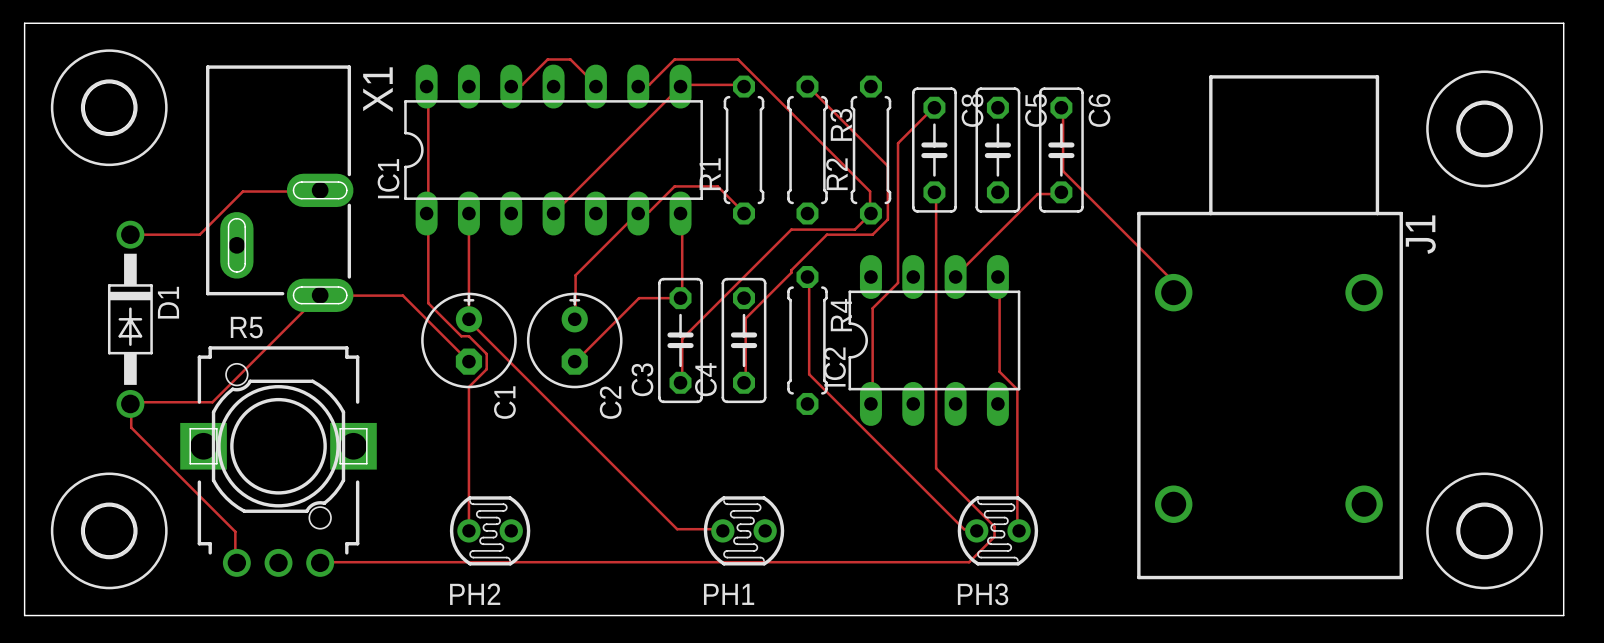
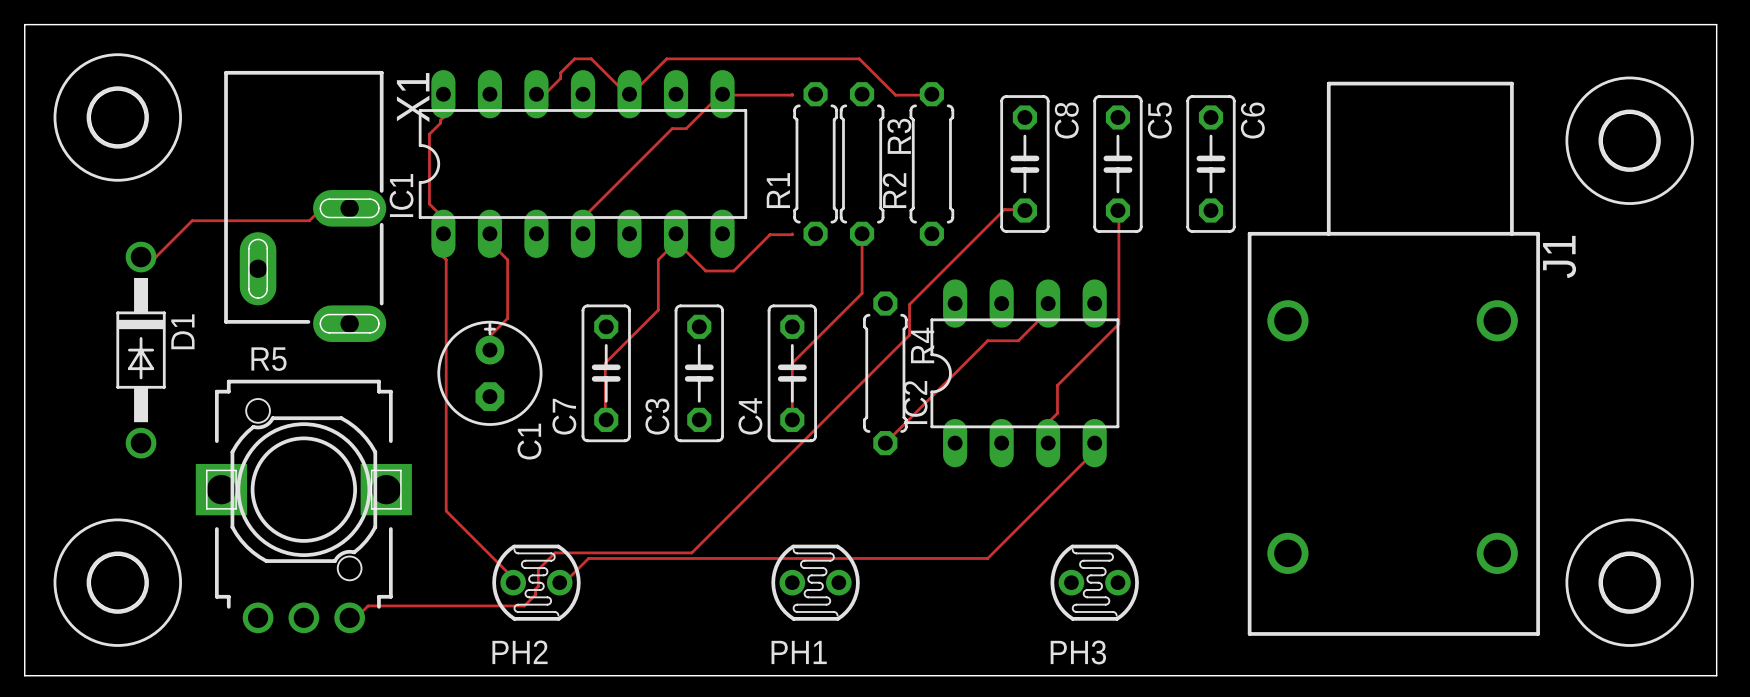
track: (426, 86) (428, 87) (428, 211) (426, 213) (428, 214) (428, 303) (461, 336) (468, 336) (486, 354) (486, 369) (468, 387) (468, 529) -> (443, 94) (443, 117) (429, 134) (429, 204) (443, 217) (443, 257) (446, 259) (446, 511) (507, 572) (507, 575) (513, 580)
track: none -> (536, 94) (546, 92) (560, 78) (560, 72) (574, 58) (591, 58) (627, 95) (630, 95) (666, 58) (859, 58) (895, 95) (931, 94)
track: (511, 86) (512, 84) (522, 84) (547, 59) (570, 59) (595, 86) -> none
track: (638, 86) (639, 84) (649, 84) (674, 59) (738, 59) (870, 191) (870, 213) (854, 229) (791, 229) (682, 338) (682, 381) (680, 382) -> none
track: none -> (792, 94) (722, 95) (722, 92) (686, 128) (672, 128) (582, 217) (582, 233)
track: (744, 86) (743, 84) (682, 84) (553, 213) -> none
track: (807, 86) (887, 166) (887, 219) -> (1024, 210) (1004, 209) (973, 240)
track: (934, 107) (898, 143) (898, 282) (872, 308) (872, 402) (870, 403) -> none
track: (1061, 107) (1063, 107) (1063, 171) (1172, 280) (1173, 292) -> none
IC1 position: (553, 150) -> (582, 164)
R3 position: (807, 150) -> (862, 164)
R2 position: (870, 150) -> (931, 164)
C5 position: (997, 150) -> (1117, 164)
C6 position: (1061, 150) -> (1210, 164)
track: (293, 191) (242, 191) (199, 234) (143, 234) -> (320, 209) (309, 220) (192, 220) (155, 257)
track: (934, 192) (936, 194) (936, 468) (994, 526) (994, 536) (969, 562) (326, 562) -> (956, 257) (909, 304) (909, 335) (691, 552) (555, 552) (538, 569) (538, 586) (535, 589) (535, 594) (524, 605) (368, 605) (356, 617)
track: none -> (1117, 210) (1118, 324) (1057, 385) (1057, 413) (1049, 421) (1048, 443)
track: (1061, 192) (1060, 194) (1037, 194) (955, 276) -> (885, 443) (987, 340) (1018, 340) (1046, 312) (1046, 304) (1048, 303)
track: none -> (489, 233) (490, 243) (507, 259) (507, 318) (490, 335) (489, 350)
track: (468, 213) (468, 321) (677, 529) (722, 529) (722, 530) -> none
track: (680, 213) (682, 214) (682, 298) (639, 298) (574, 361) -> none
track: none -> (792, 233) (769, 234) (733, 271) (705, 271) (675, 240) (676, 233) (675, 234) (675, 243) (658, 259) (658, 310) (605, 363) (606, 419)
track: (744, 213) (717, 186) (674, 186) (649, 211) (639, 211) (575, 275) (574, 319) -> none
track: none -> (862, 233) (862, 293) (792, 363) (792, 419)
track: (872, 234) (826, 234) (745, 318) (745, 381) (744, 382) -> none
track: (807, 276) (809, 277) (809, 374) (964, 529) (976, 529) (976, 530) -> none
track: (997, 276) (999, 277) (999, 371) (1017, 389) (1017, 529) (1019, 530) -> none
C1 position: (468, 340) -> (489, 373)
C7: none -> (606, 373)
C2: (574, 340) -> none
C3 position: (680, 340) -> (699, 373)
C4 position: (744, 340) -> (792, 373)
track: (468, 361) (402, 295) (320, 295) (212, 402) (131, 402) (130, 403) -> none
track: (130, 403) (131, 427) (235, 531) (236, 562) -> none
track: none -> (1094, 443) (1093, 452) (987, 558) (588, 558) (566, 580) (560, 580) (559, 582)

